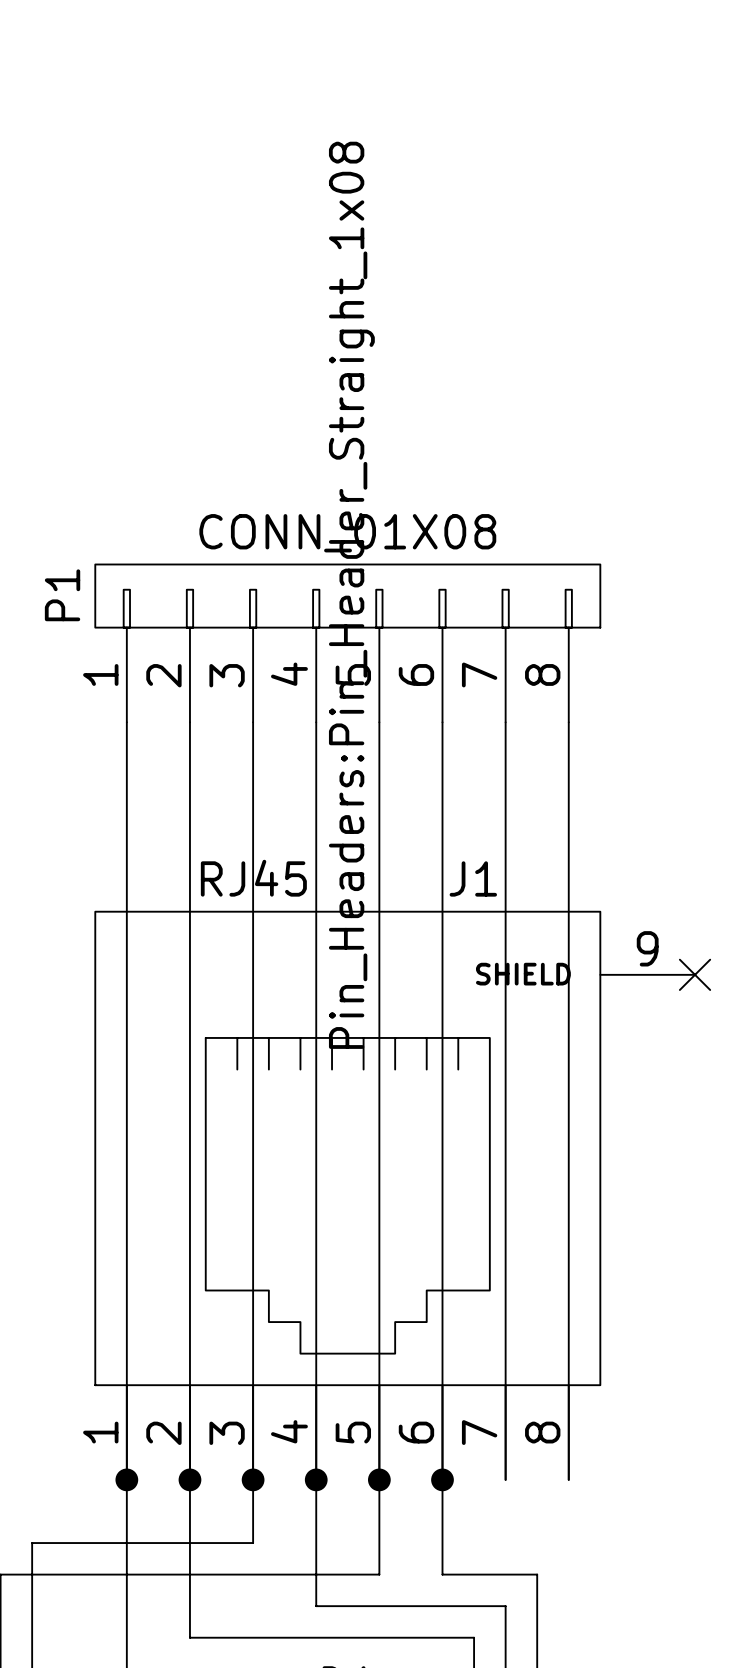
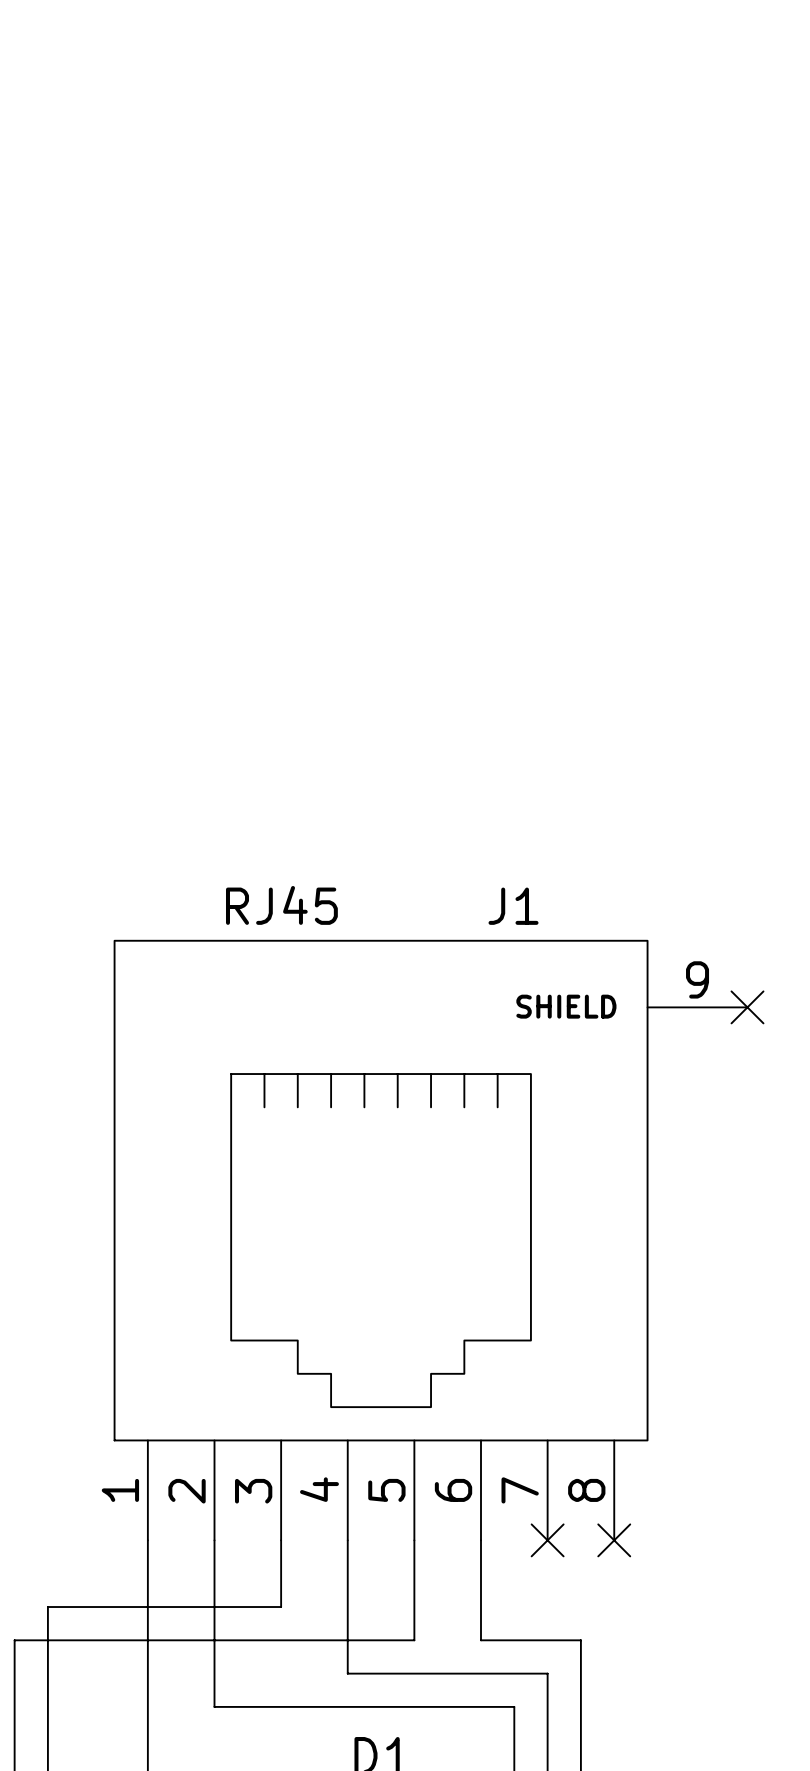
P1: CONN_01X08 (347, 643) -> none
wire: (126, 722) (126, 1479) -> none
wire: (189, 722) (189, 1479) -> none
wire: (253, 722) (253, 1479) -> none
wire: (316, 722) (316, 1479) -> none
wire: (379, 722) (379, 1479) -> none
wire: (442, 722) (442, 1479) -> none
wire: (505, 722) (505, 1479) -> none
wire: (568, 722) (568, 1479) -> none
junction: (126, 1479) -> none
junction: (189, 1479) -> none
junction: (253, 1479) -> none
junction: (316, 1479) -> none
junction: (379, 1479) -> none
junction: (442, 1479) -> none
no-connect mark: none -> (547, 1540)
no-connect mark: none -> (614, 1540)

